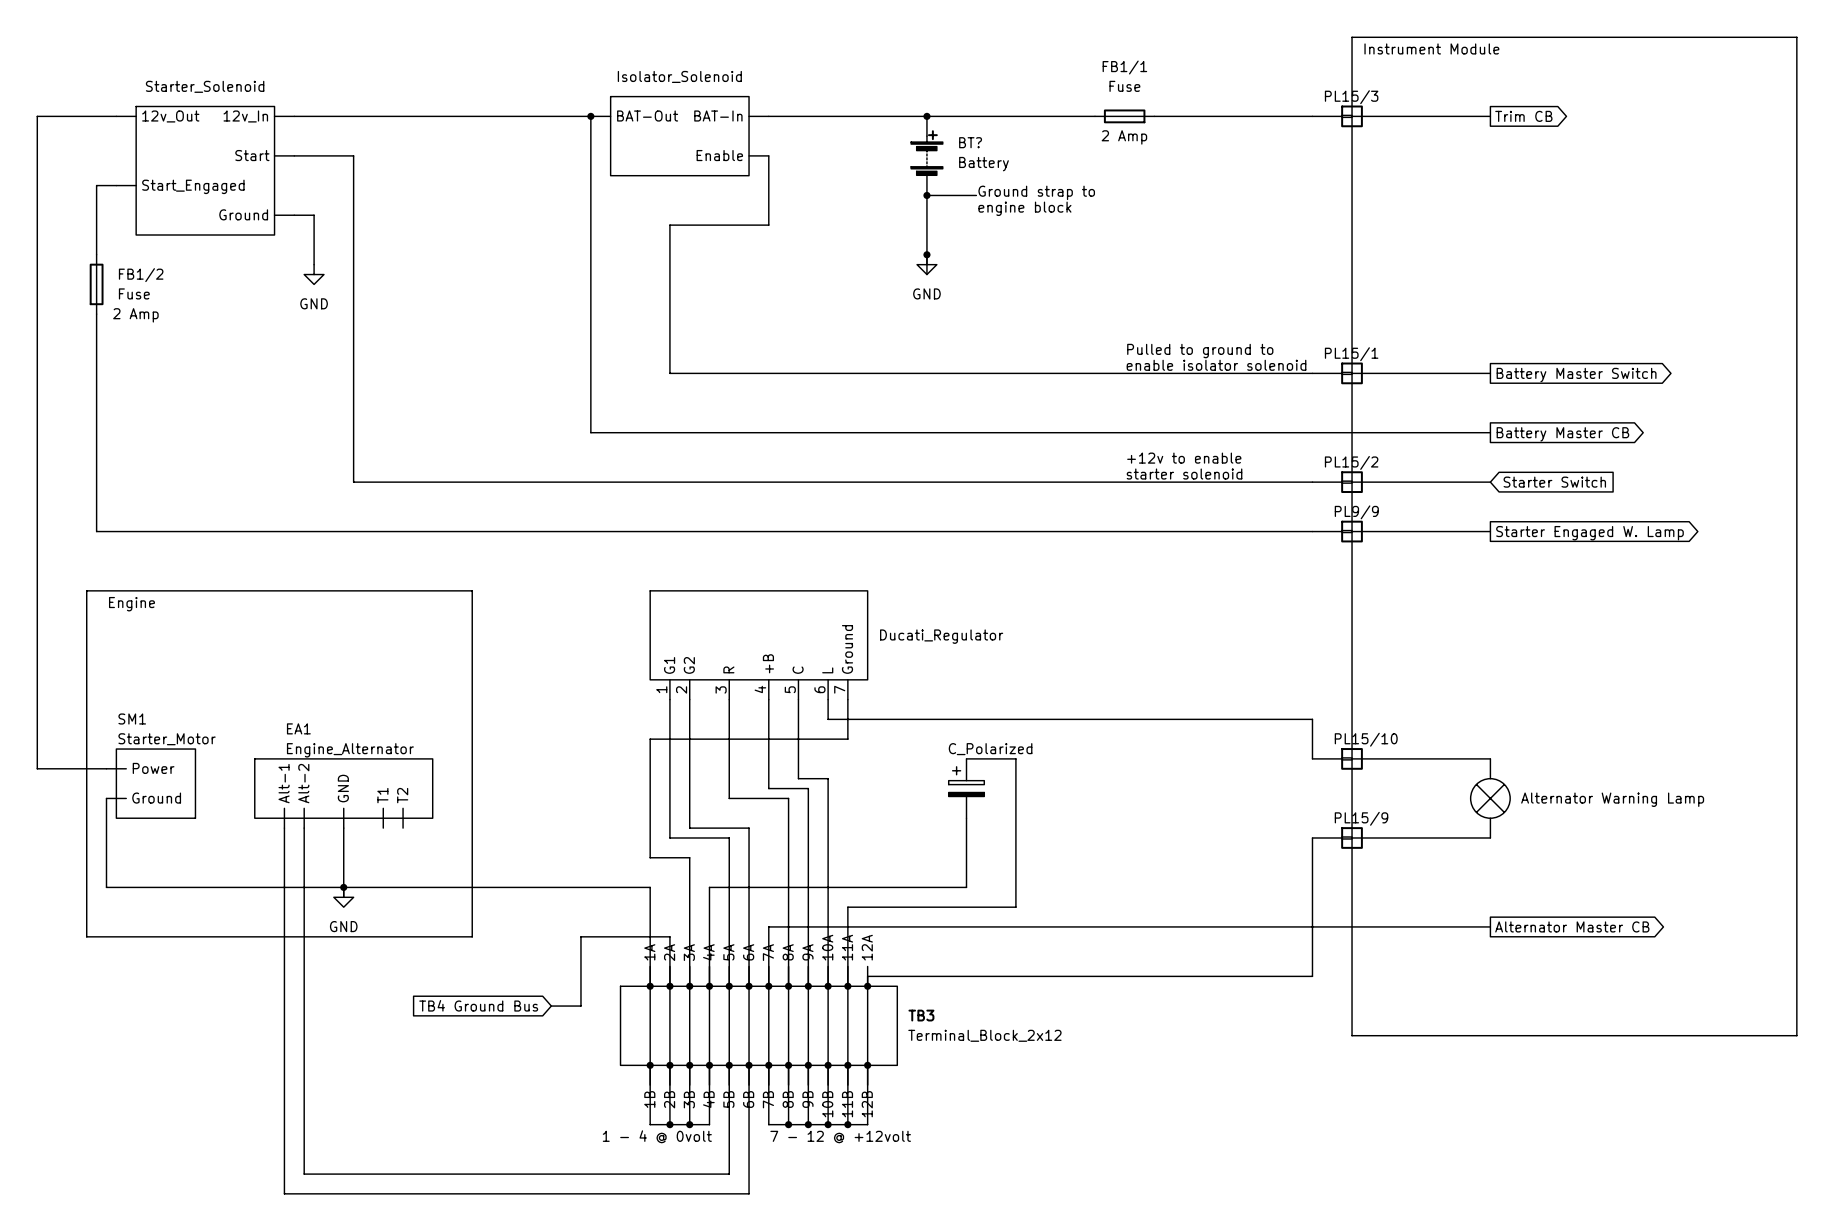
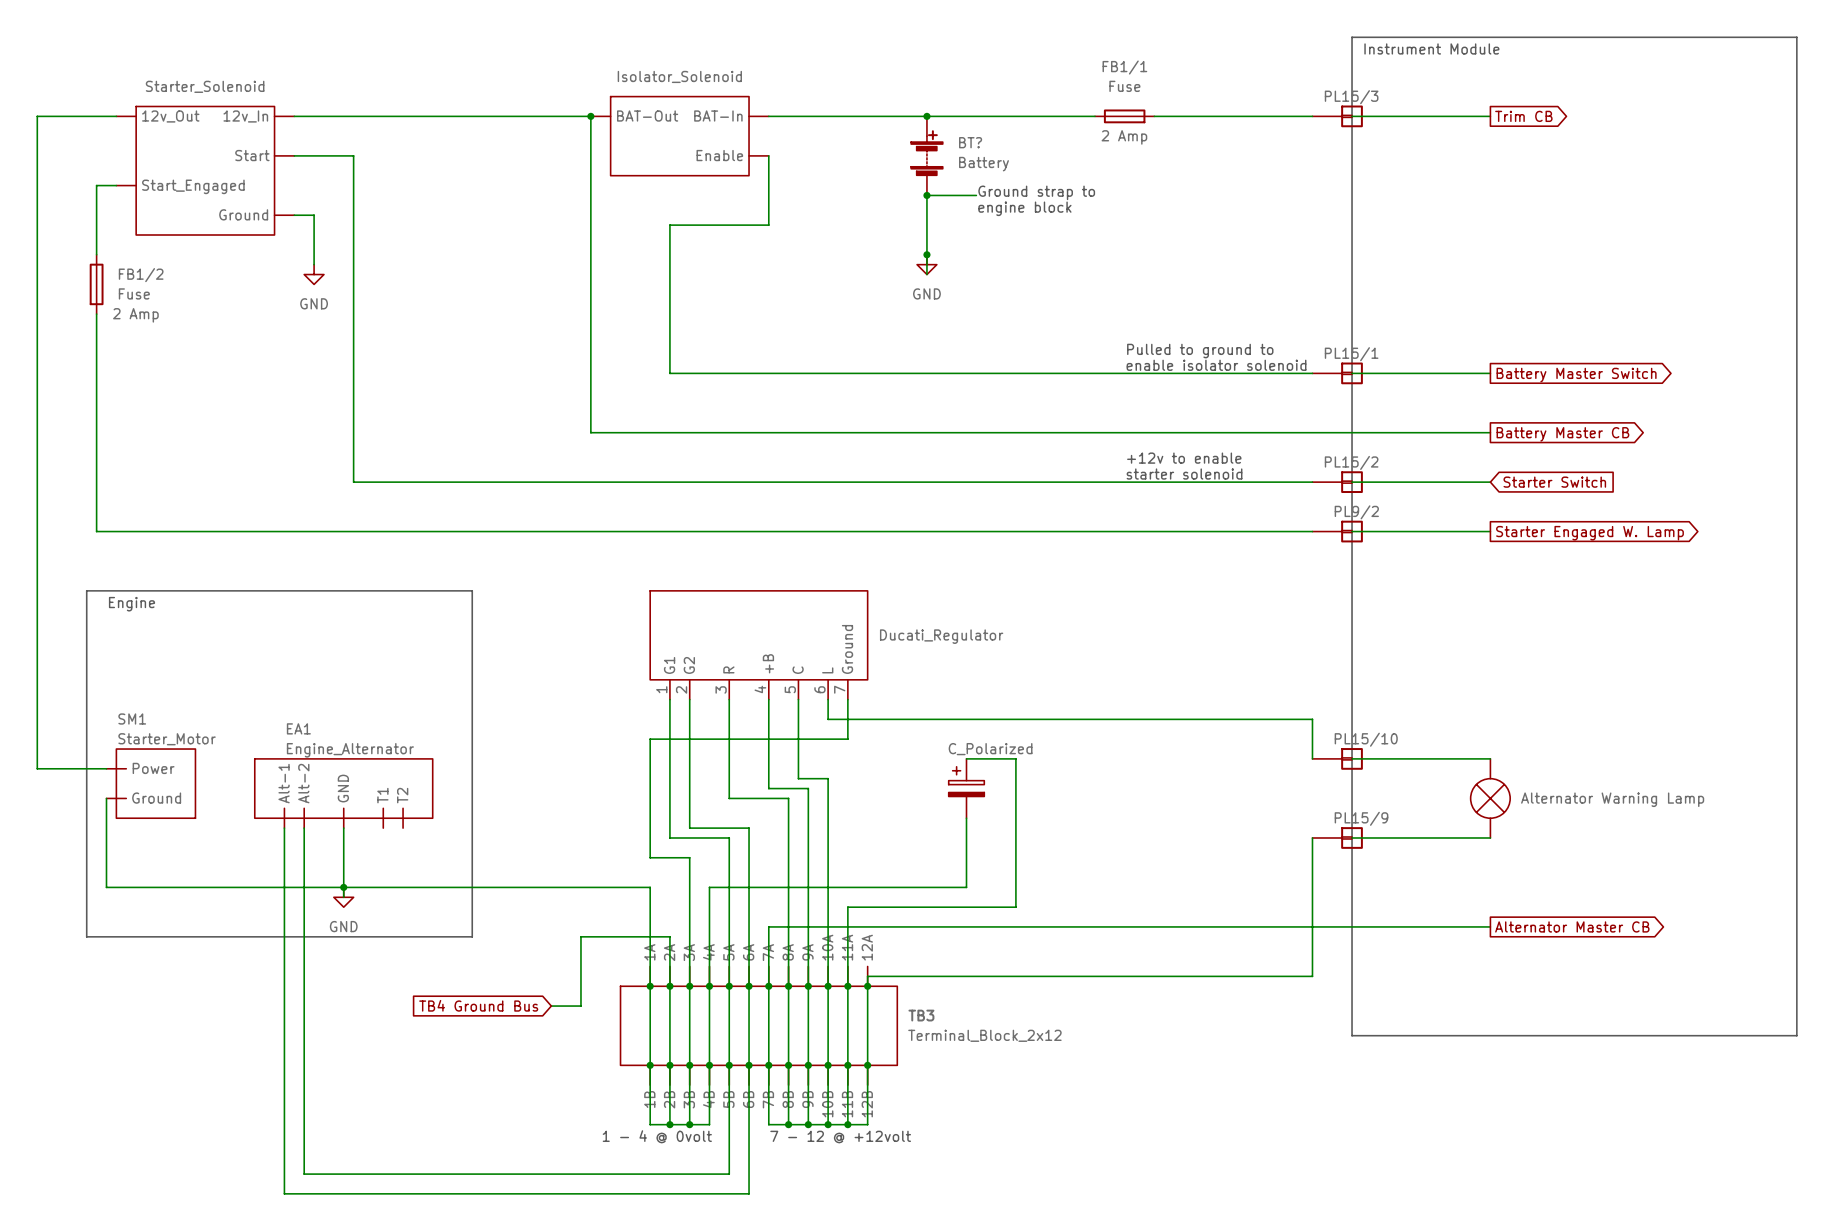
PL9/9 name: PL9/9 (1356, 512) -> PL9/2 (1356, 512)

